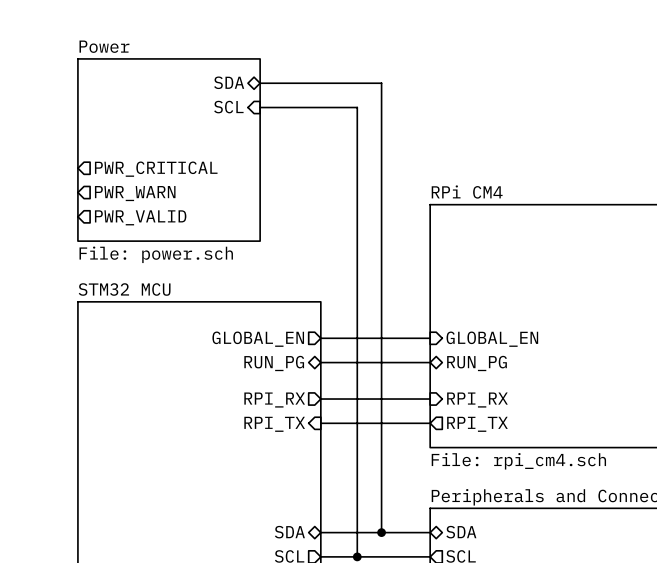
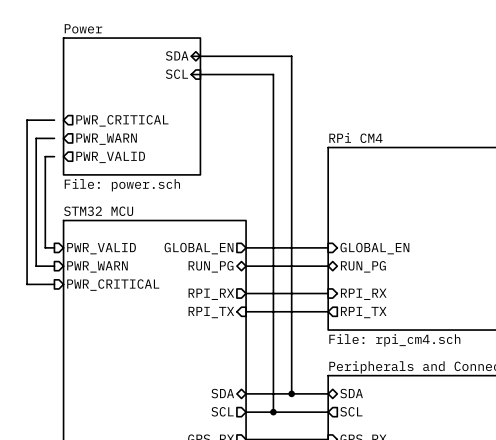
wire: none -> (191, 56) (200, 56)
wire: none -> (191, 74) (200, 74)
wire: none -> (54, 120) (27, 120) (27, 284) (54, 284)
wire: none -> (54, 138) (36, 138) (36, 266) (54, 266)
wire: none -> (54, 156) (45, 156) (45, 247) (54, 247)
sheet pin: none -> PWR_VALID (101, 248)
sheet pin: none -> PWR_WARN (97, 266)
sheet pin: none -> PWR_CRITICAL (113, 285)

